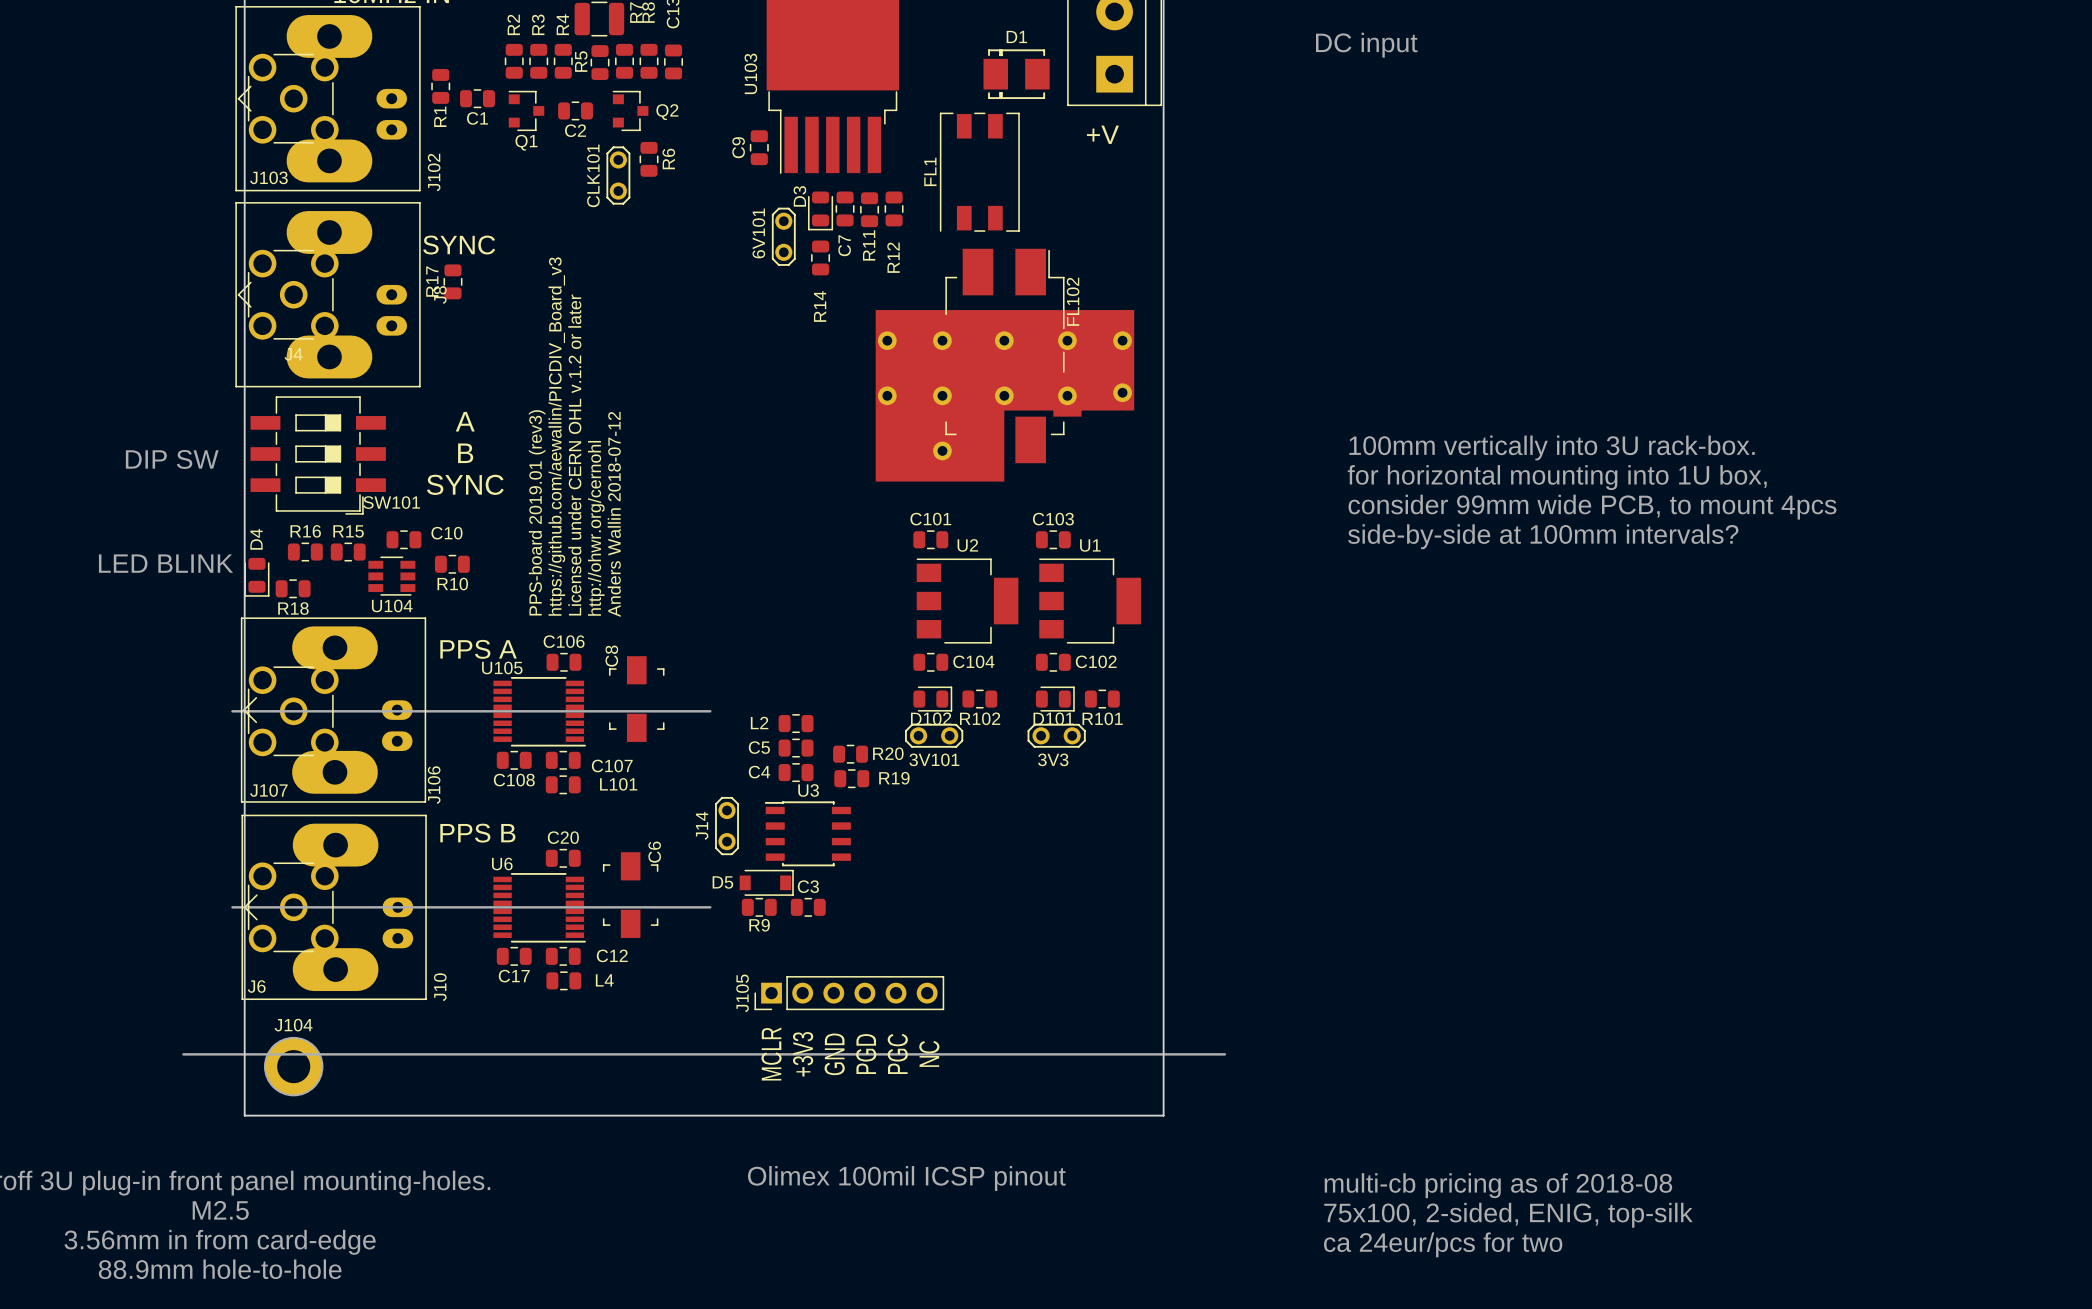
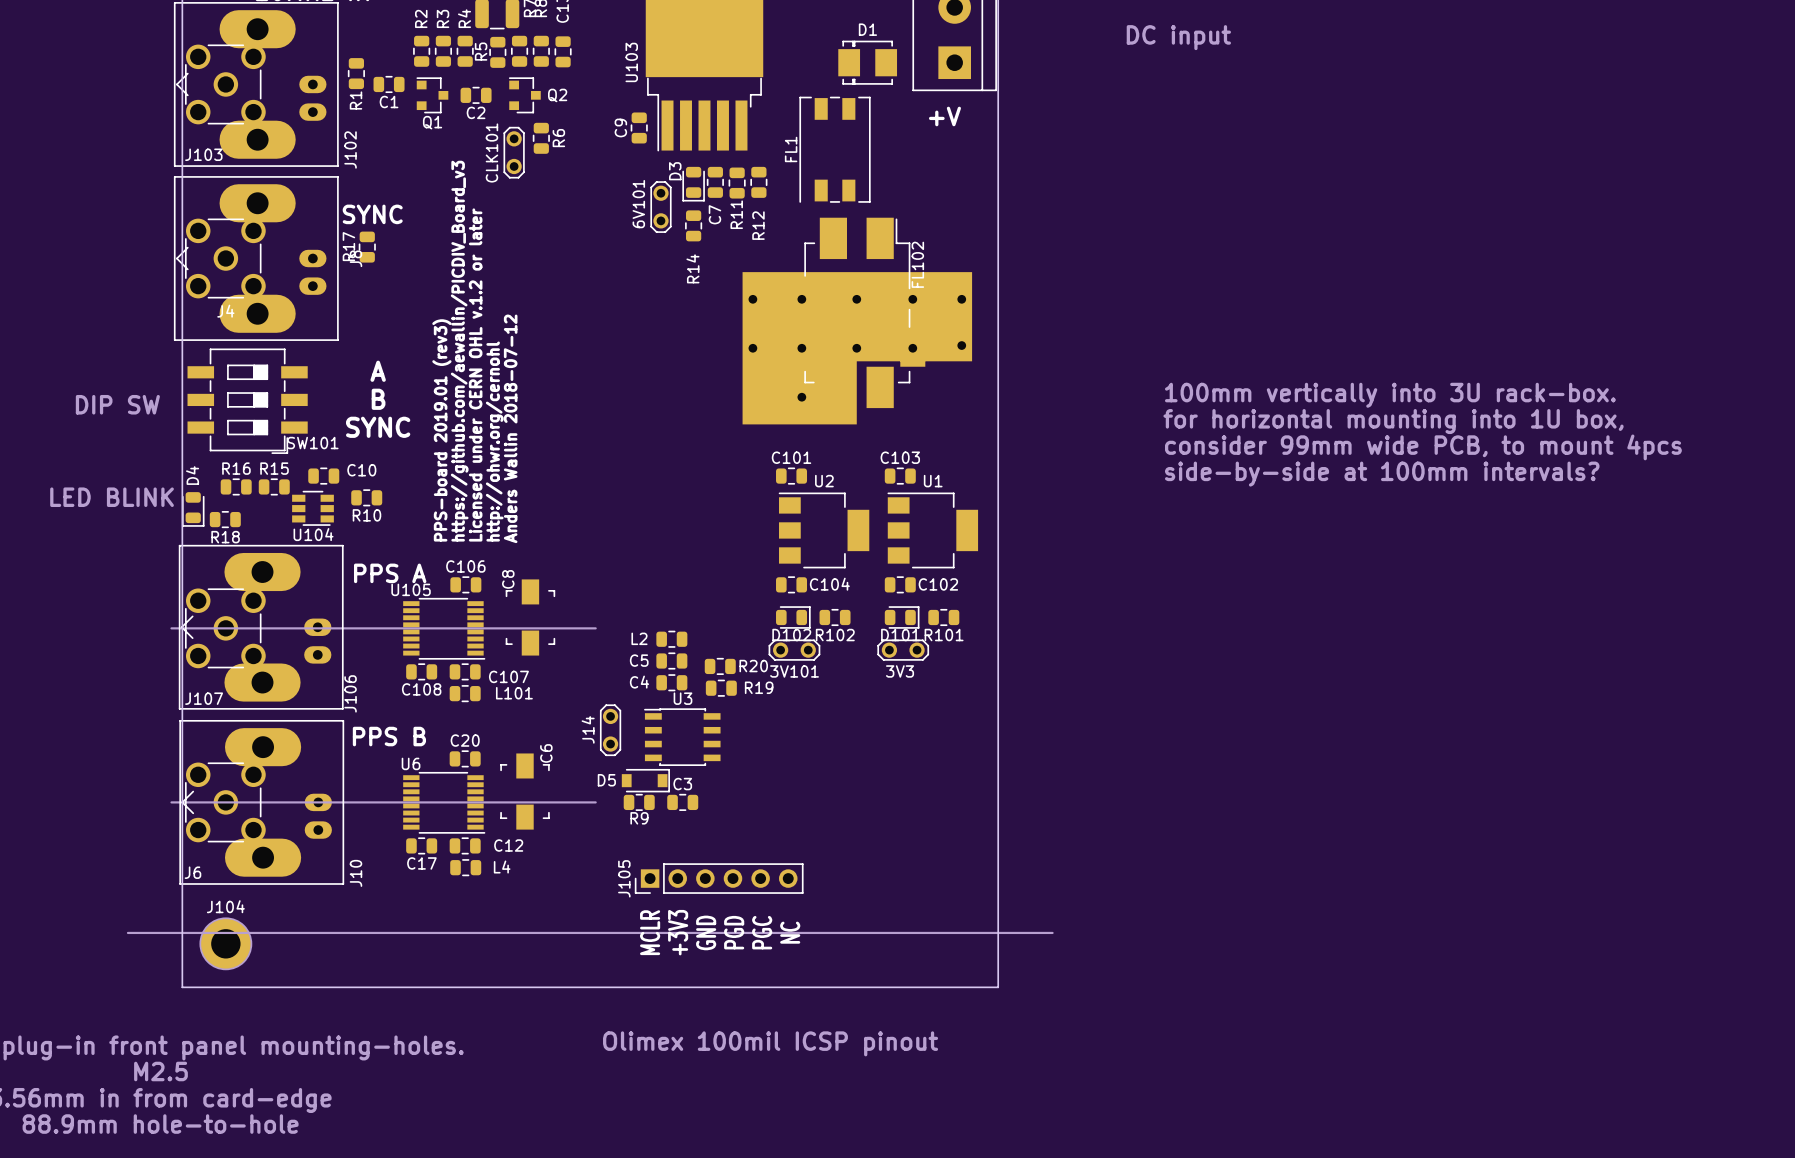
text: multi-cb pricing as of 2018-08 (1498, 1185) -> none
text: 75x100, 2-sided, ENIG, top-silk (1508, 1215) -> none
text: ca 24eur/pcs for two (1443, 1244) -> none

